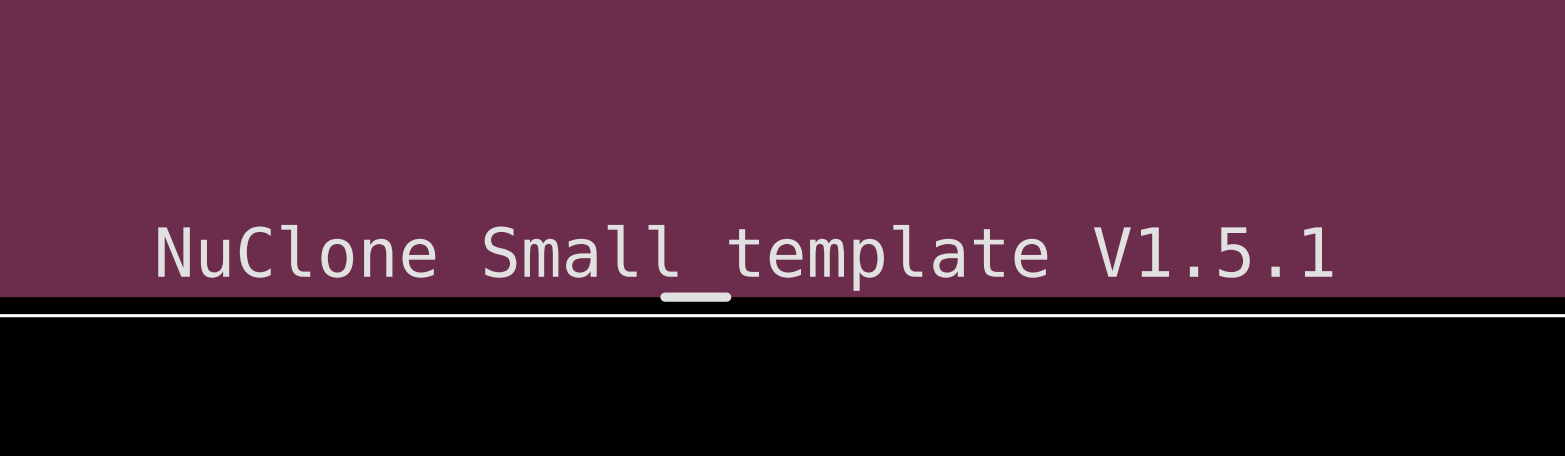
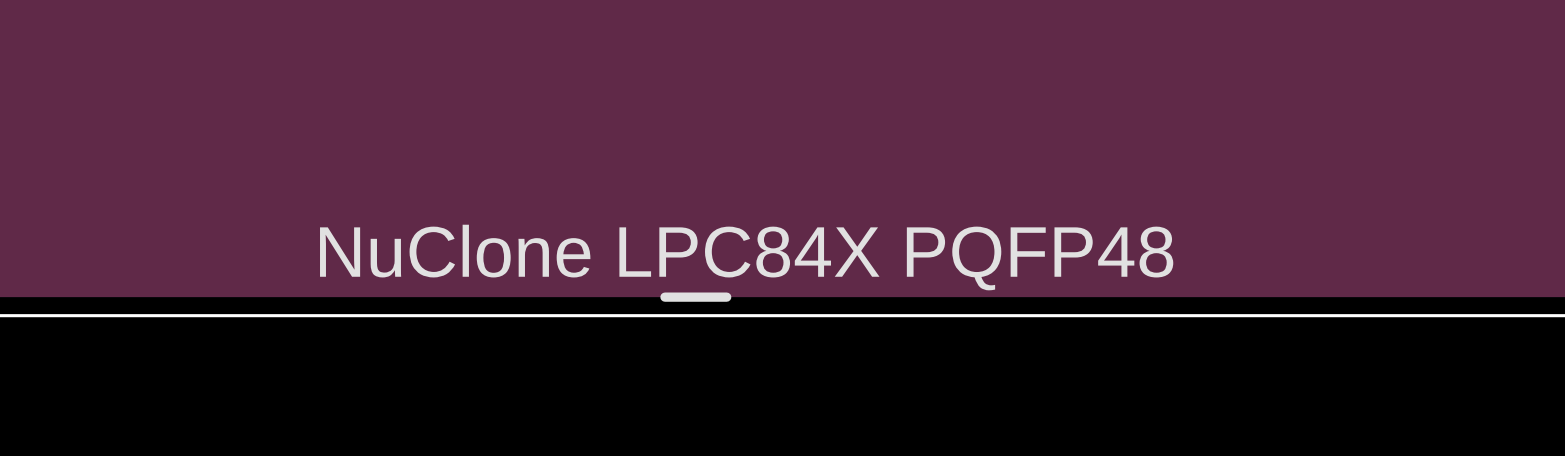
drawing shape: [158, 224, 1333, 302] -> [320, 224, 1174, 302]

